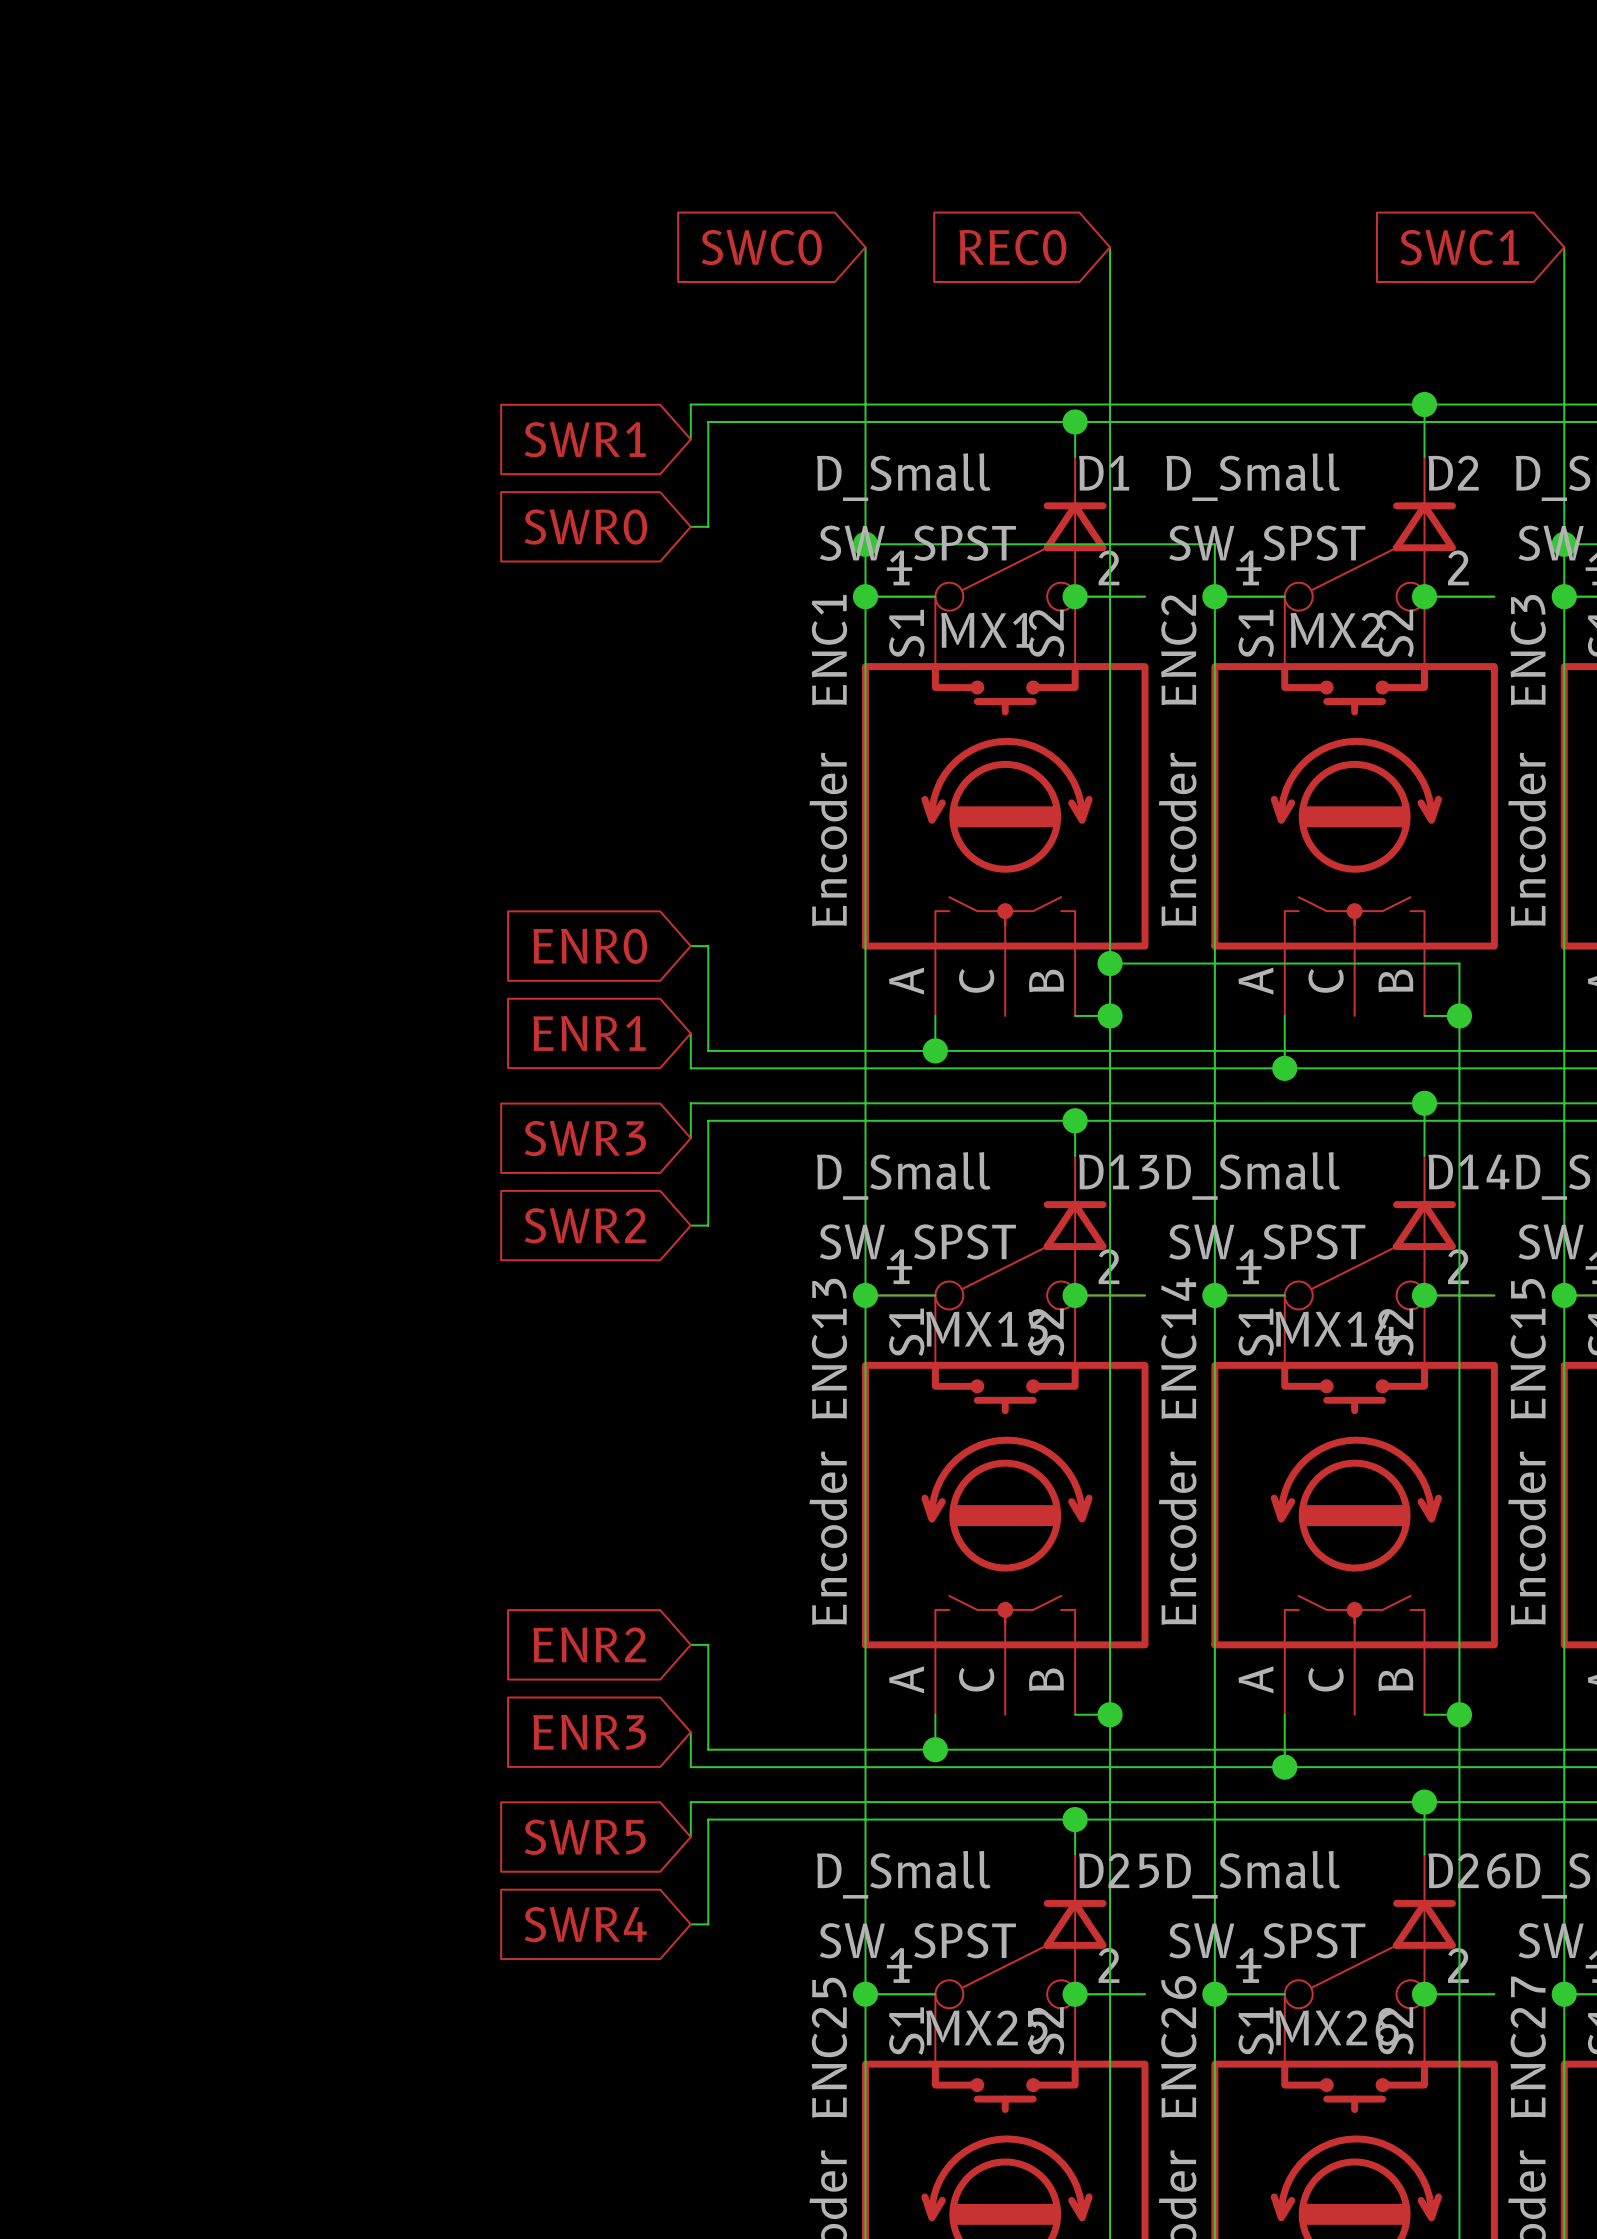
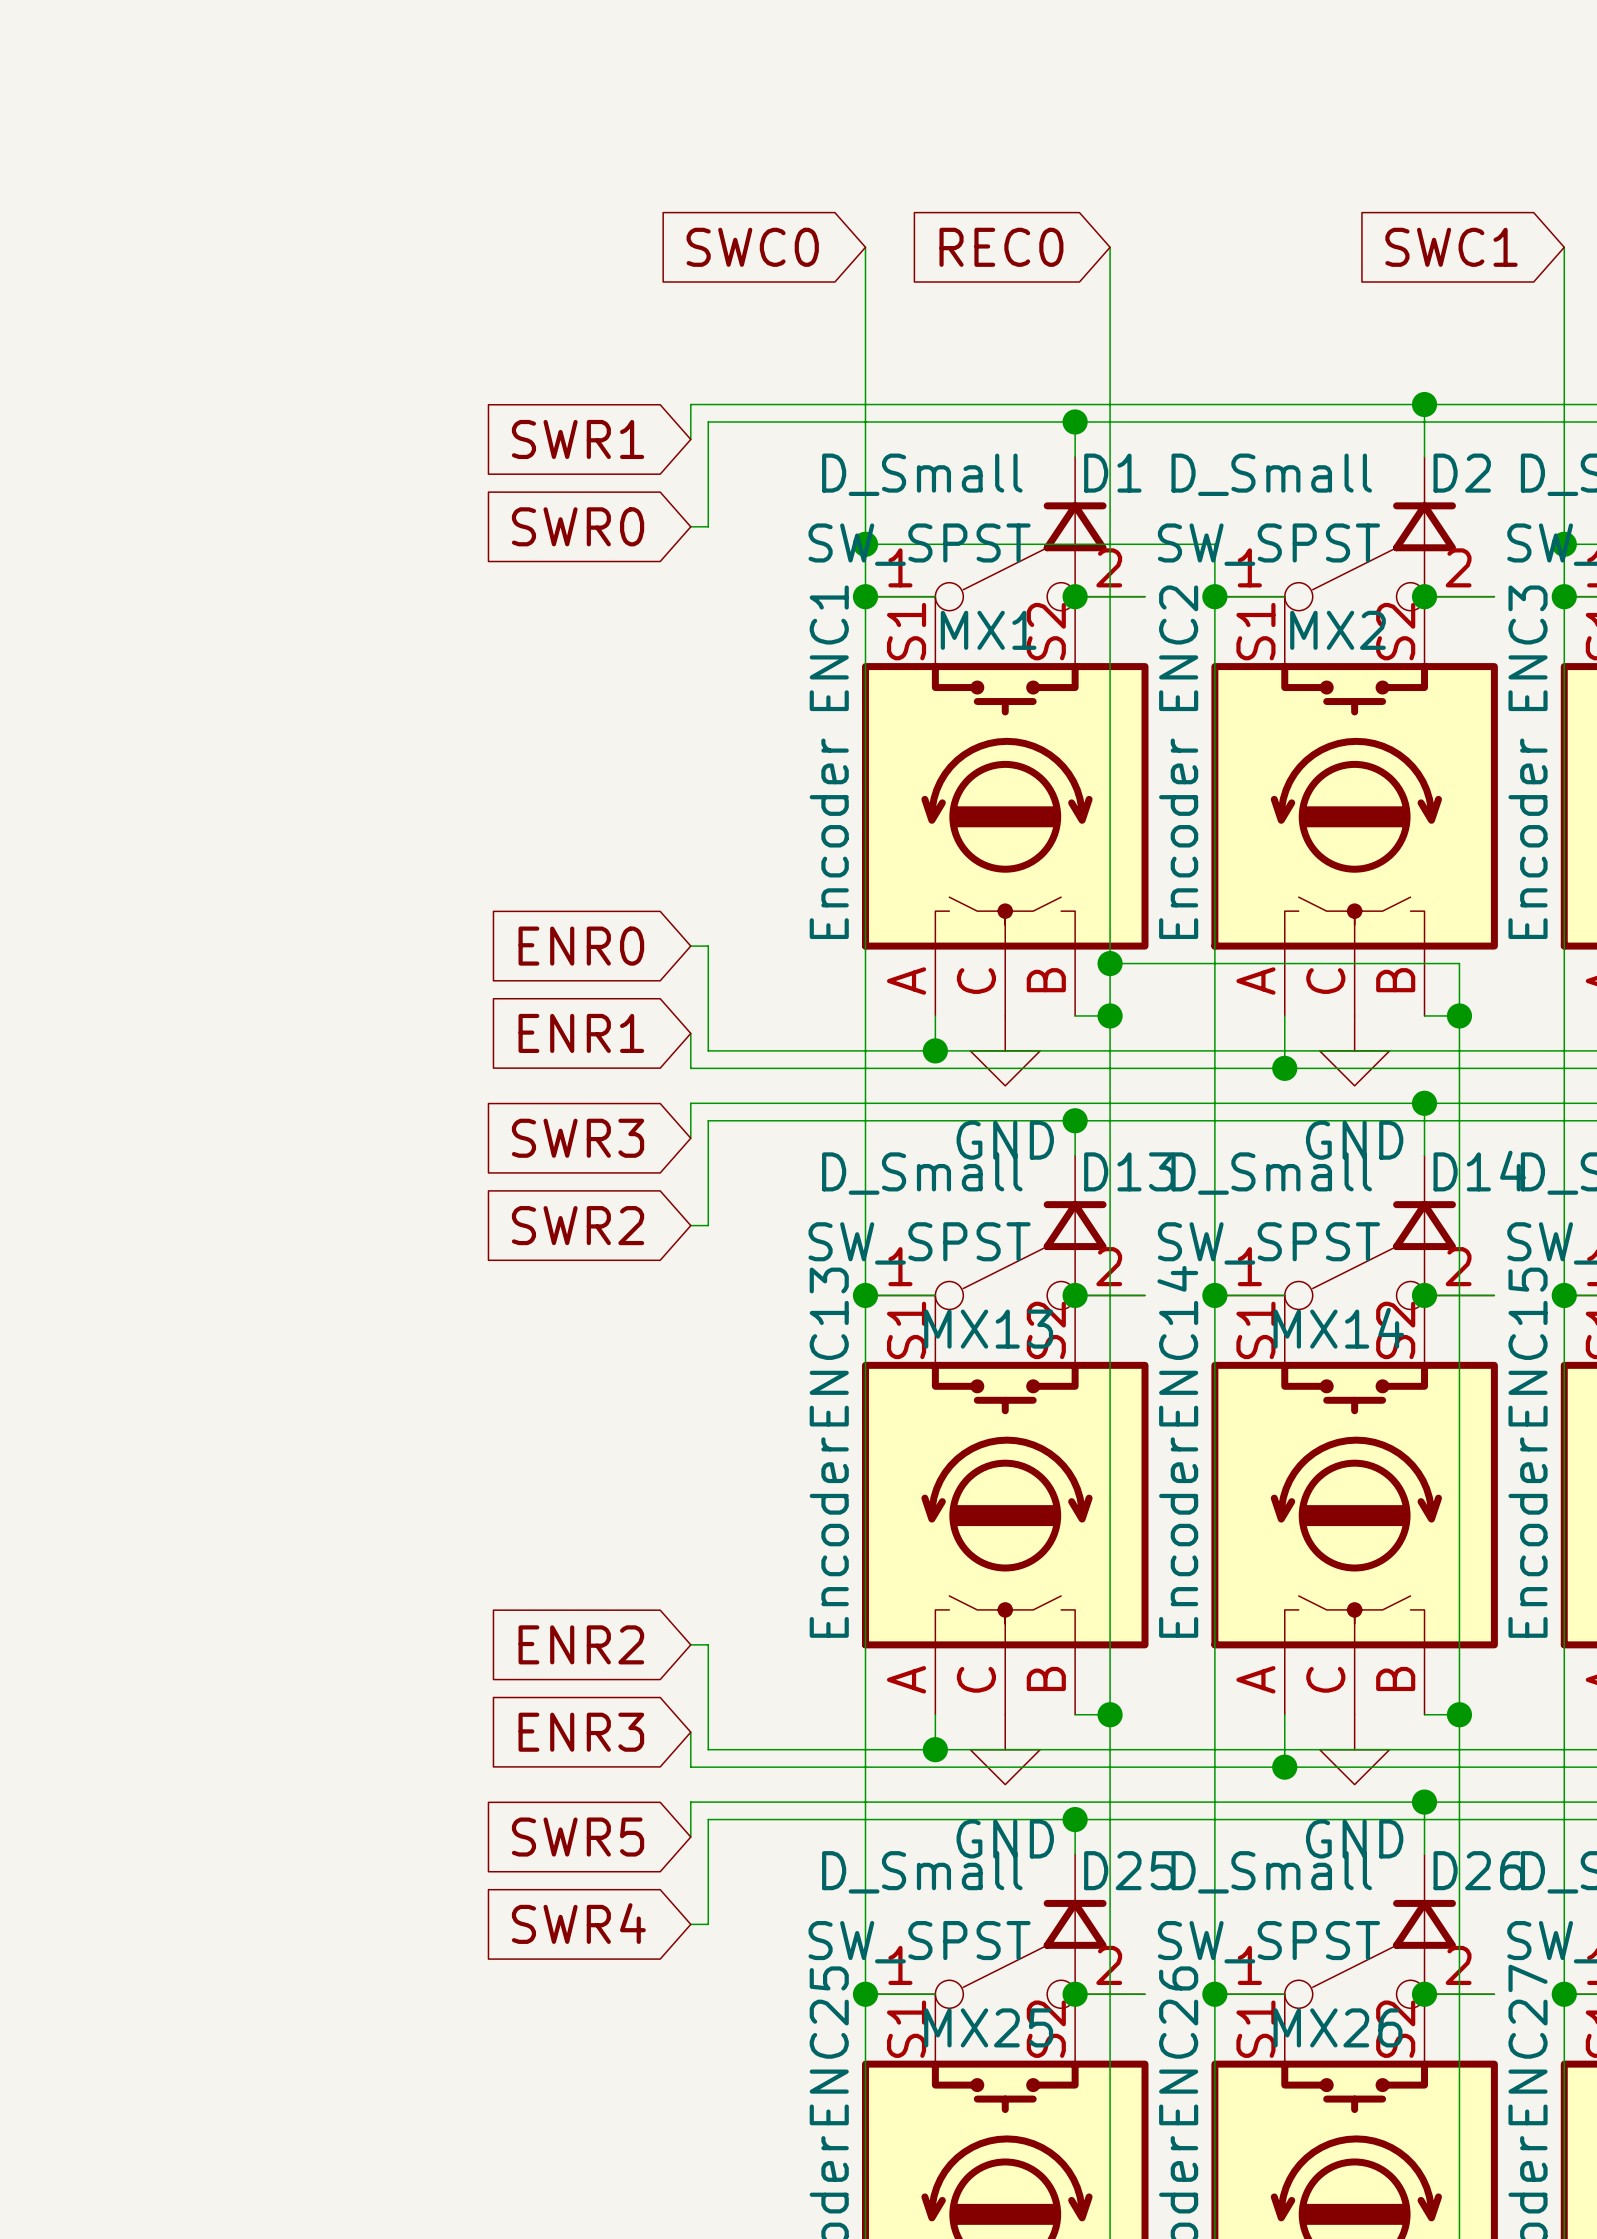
power symbol: none -> GND (1005, 1050)
power symbol: none -> GND (1354, 1050)
power symbol: none -> GND (1005, 1749)
power symbol: none -> GND (1354, 1749)

